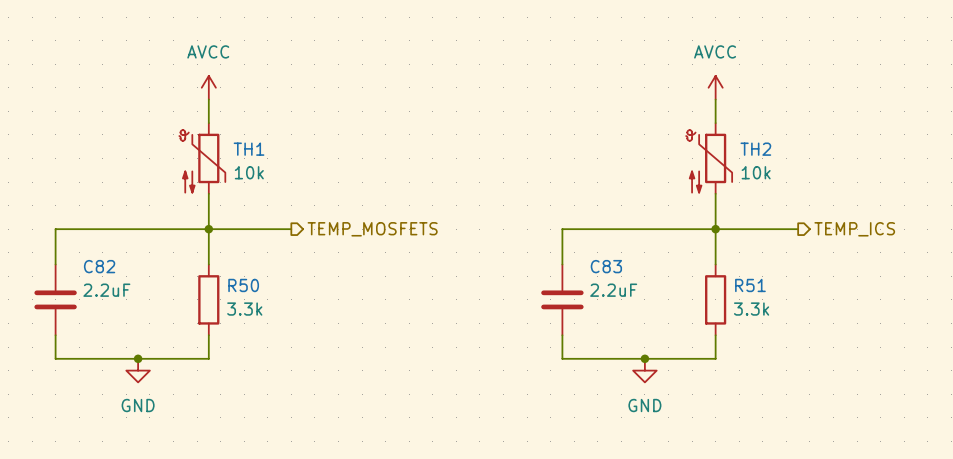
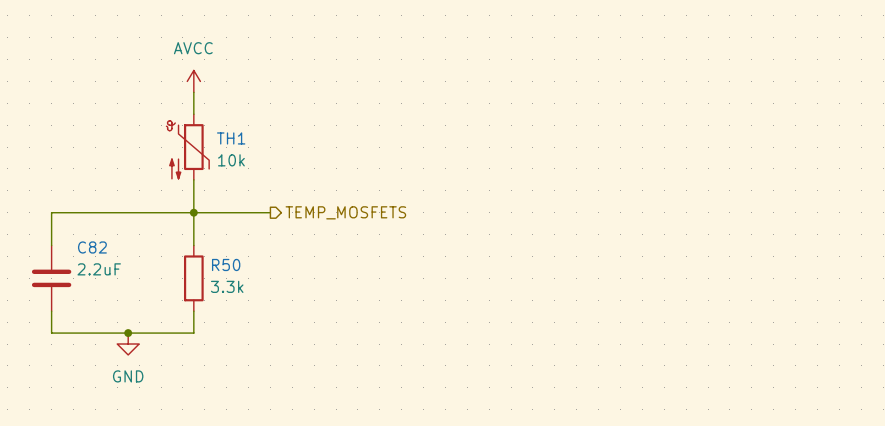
power symbol: AVCC (715, 87) -> none
wire: (715, 99) (715, 123) -> none
TH2: 10k (709, 158) -> none
wire: (715, 193) (715, 264) -> none
junction: (715, 229) -> none
wire: (798, 229) (562, 229) (562, 264) -> none
hierarchical label: TEMP_ICS (854, 229) -> none
C83: 2.2uF (562, 299) -> none
R51: 3.3k (715, 299) -> none
wire: (562, 335) (562, 358) (715, 358) (715, 335) -> none
junction: (644, 358) -> none
power symbol: GND (644, 370) -> none

